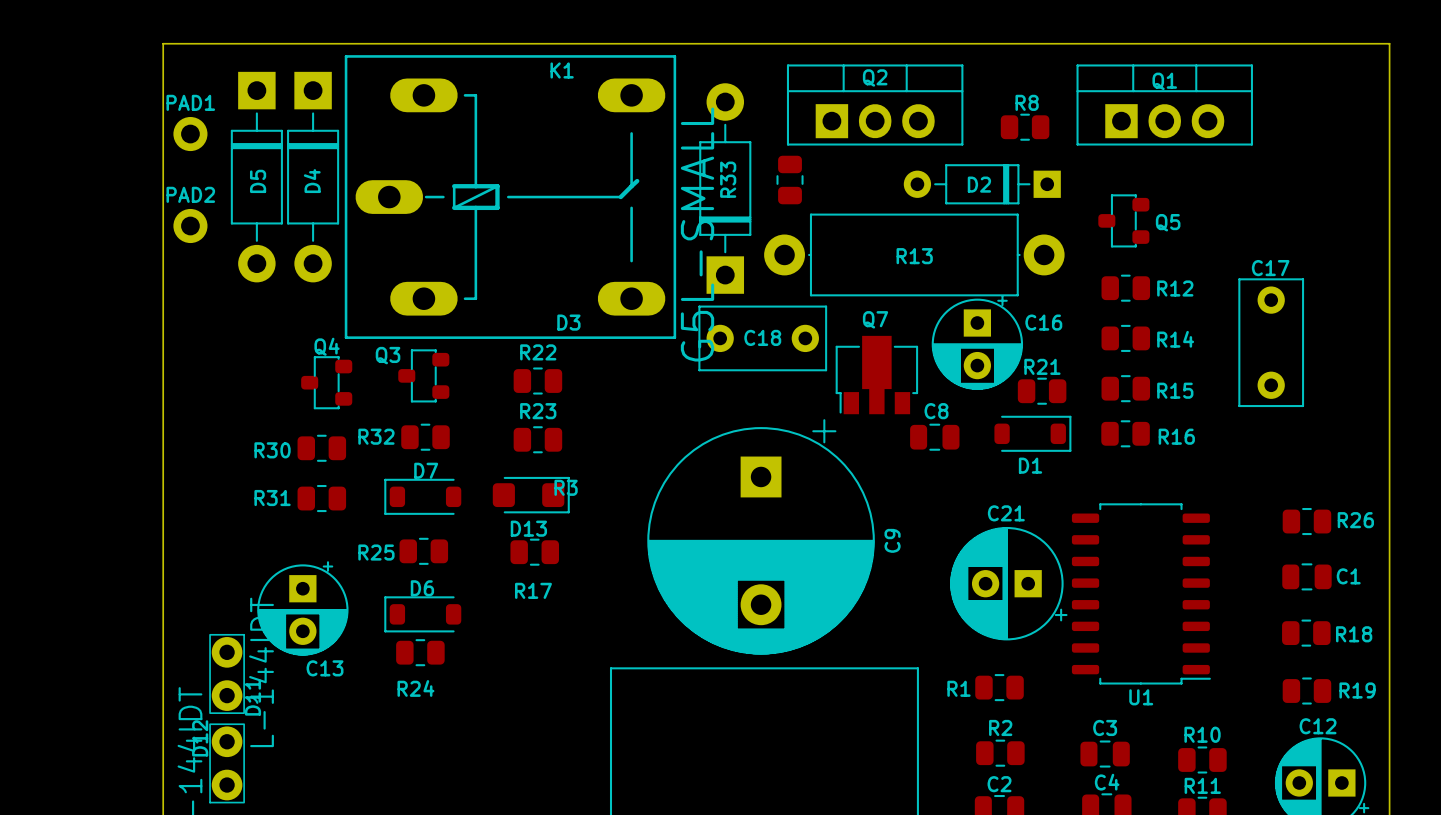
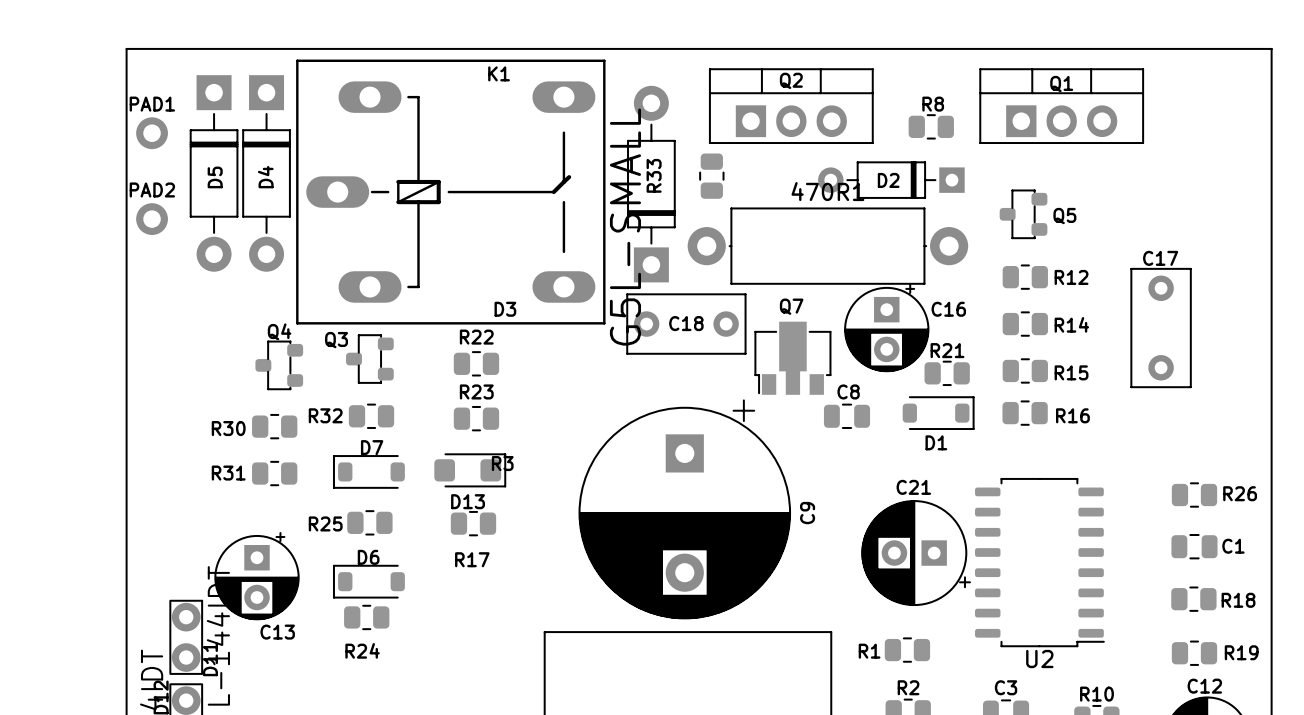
R13 name: R13 (914, 256) -> 470R1 (827, 191)
U1 name: U1 (1141, 697) -> U2 (1039, 659)

